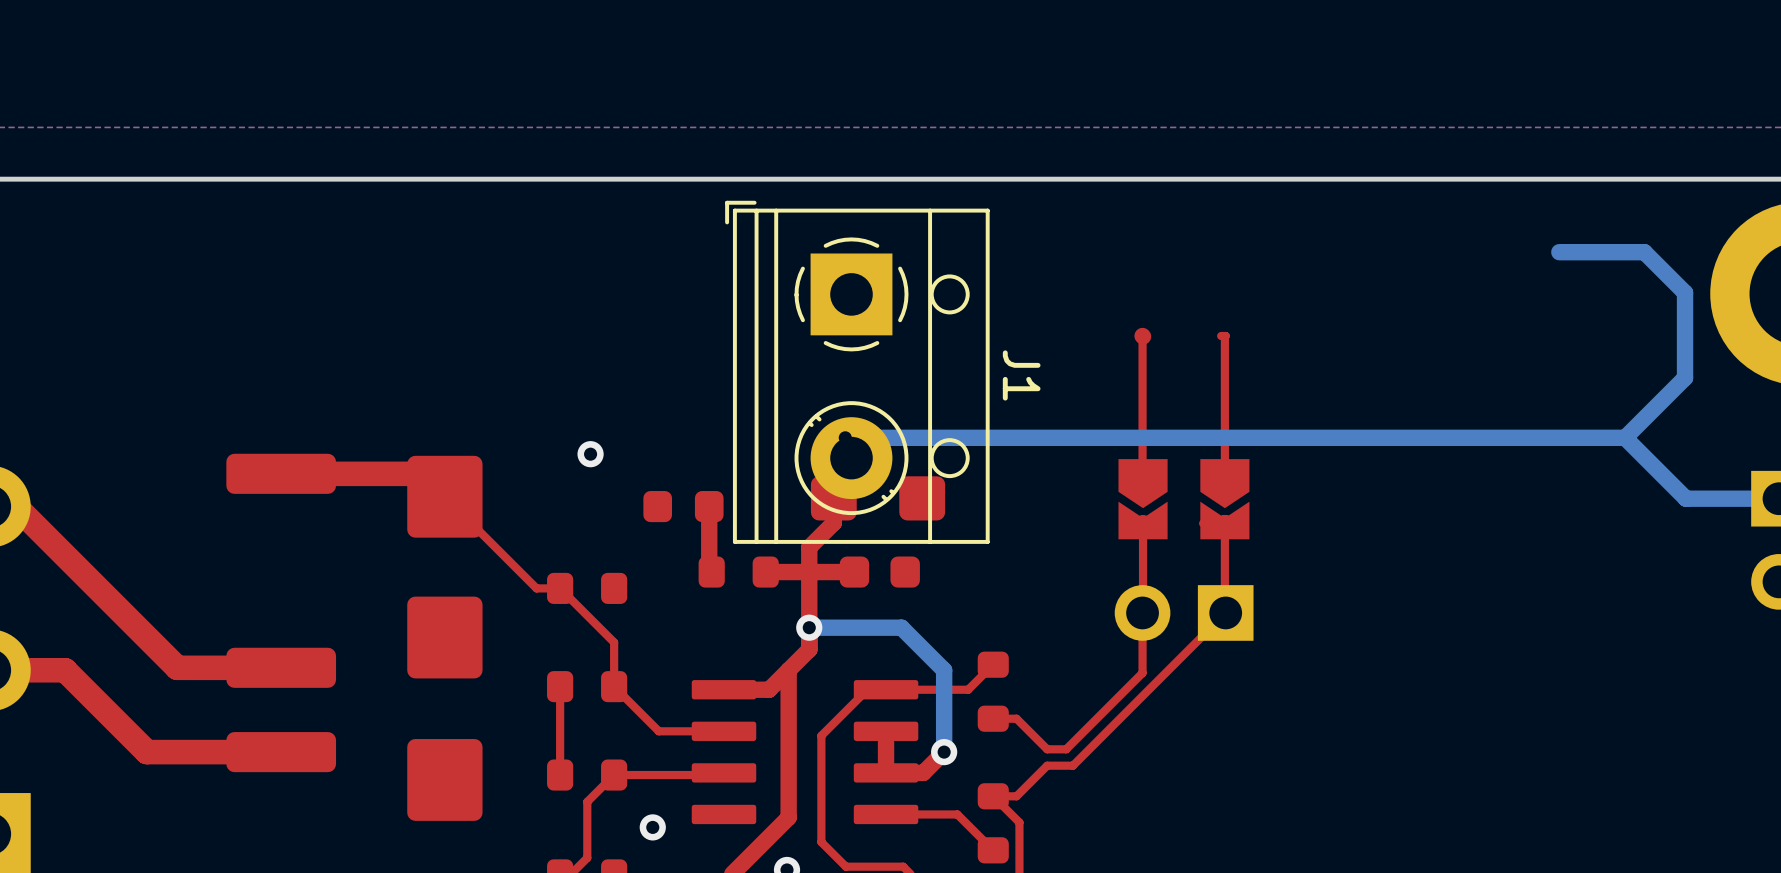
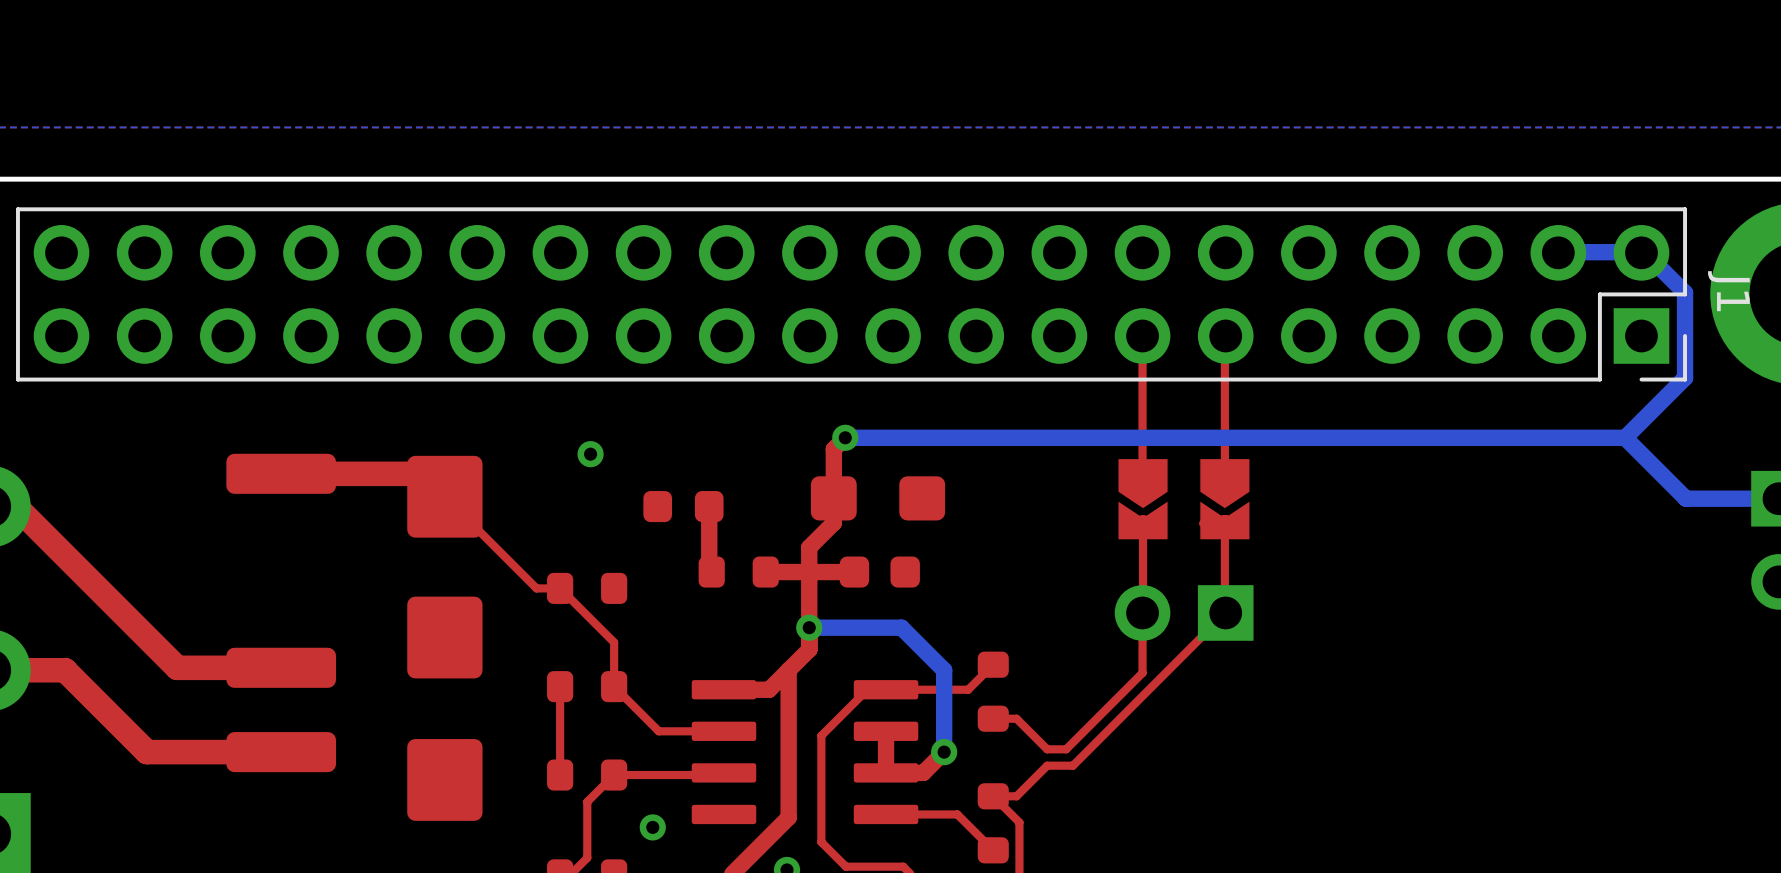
J1 footprint: [725, 200, 990, 544] -> [16, 207, 1688, 382]
J1 name position: J1 (1021, 375) -> J1 (1728, 291)

